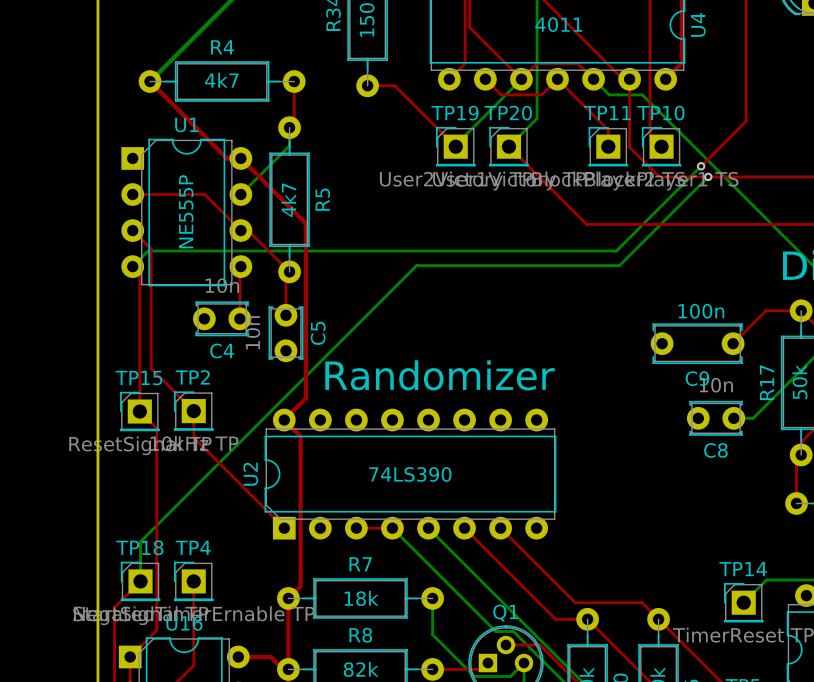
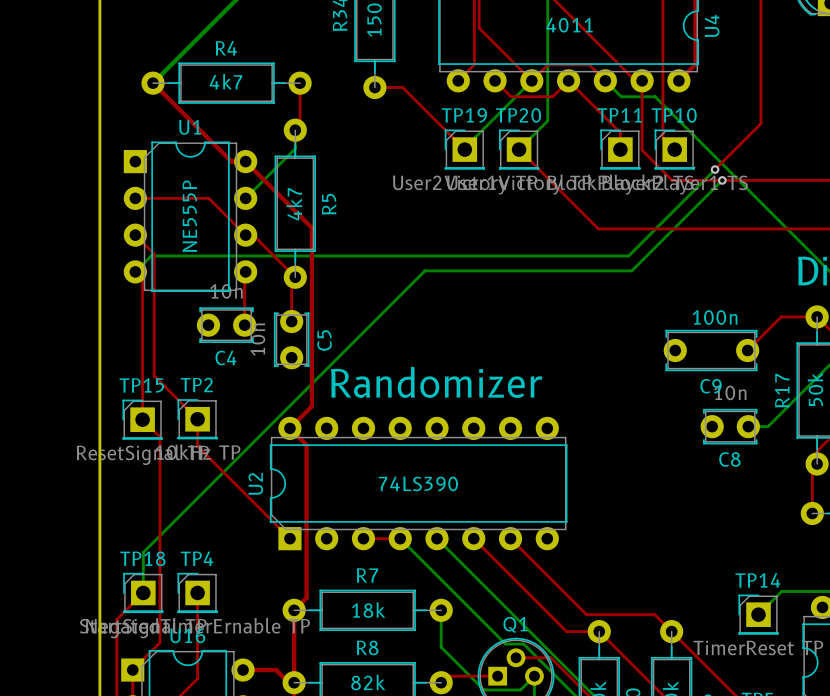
top track: none -> (497, 676) (445, 676) (441, 680)
top track: (432, 669) (481, 669) -> none

